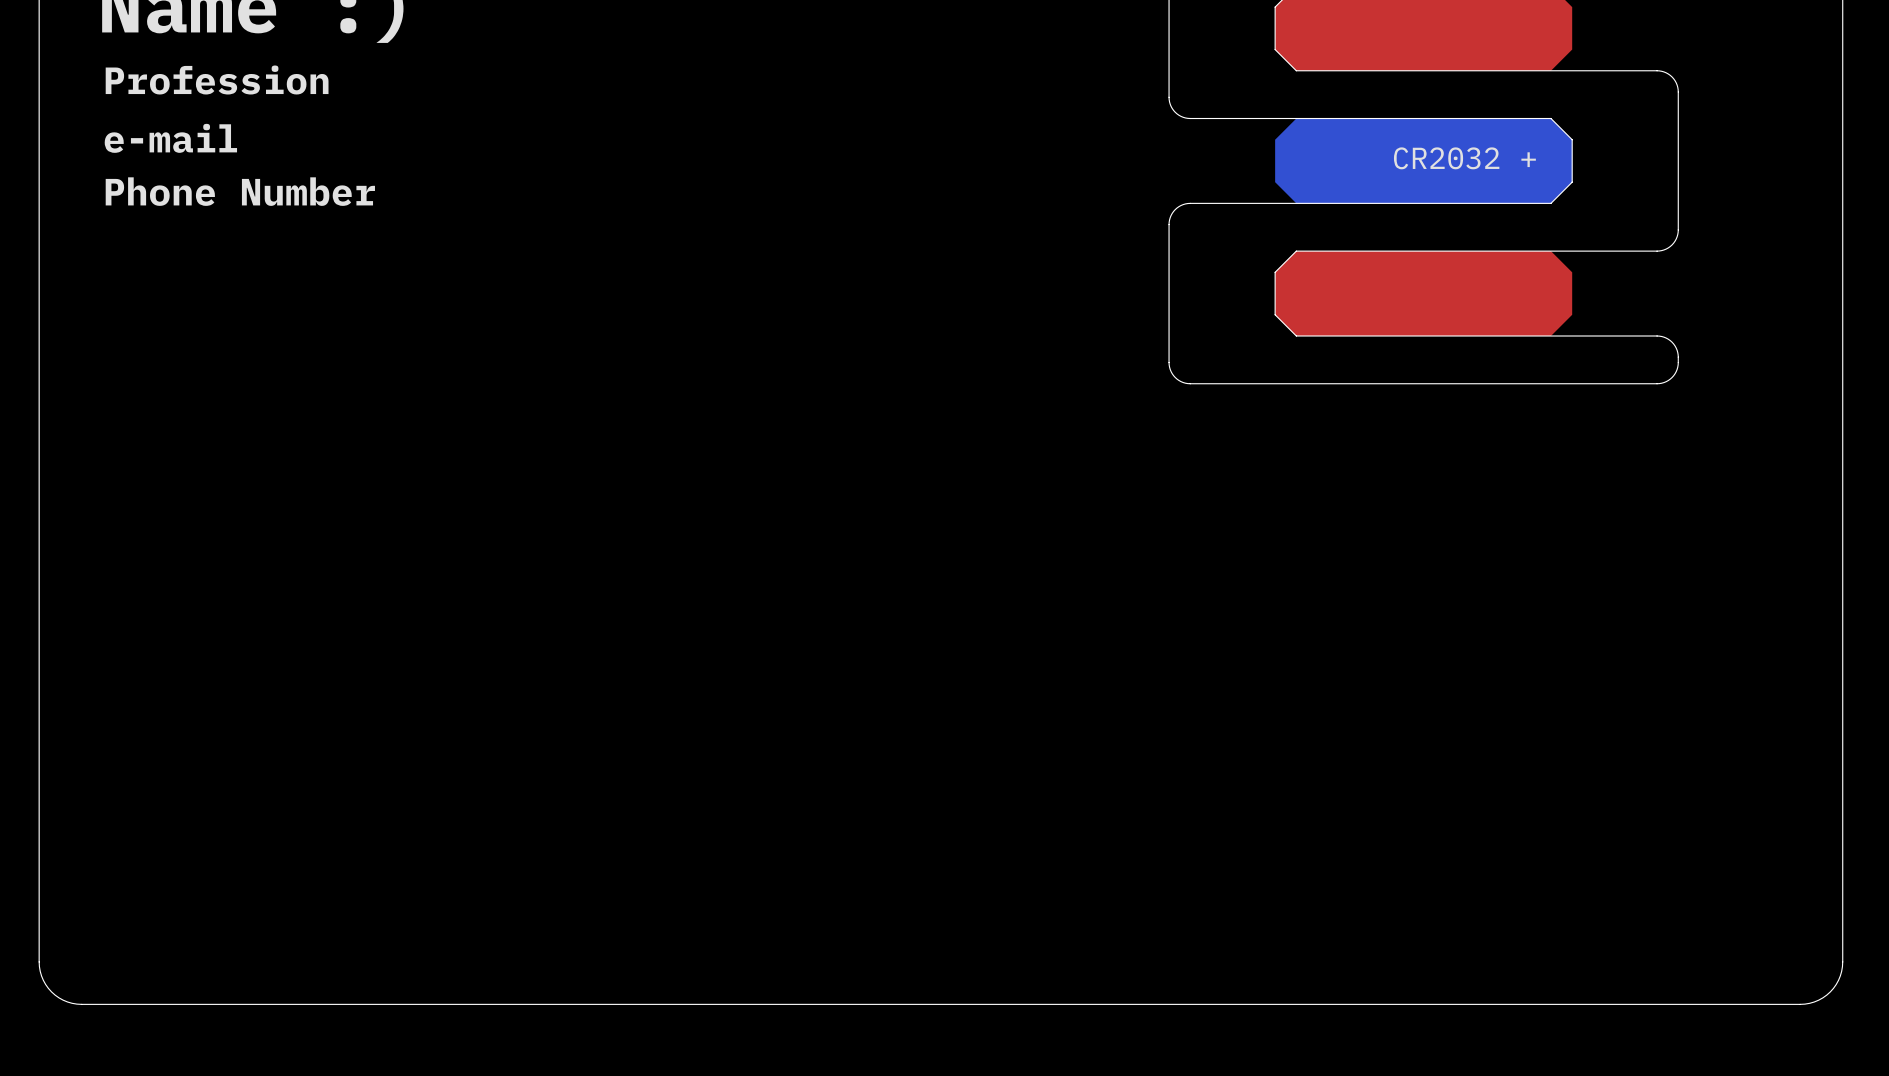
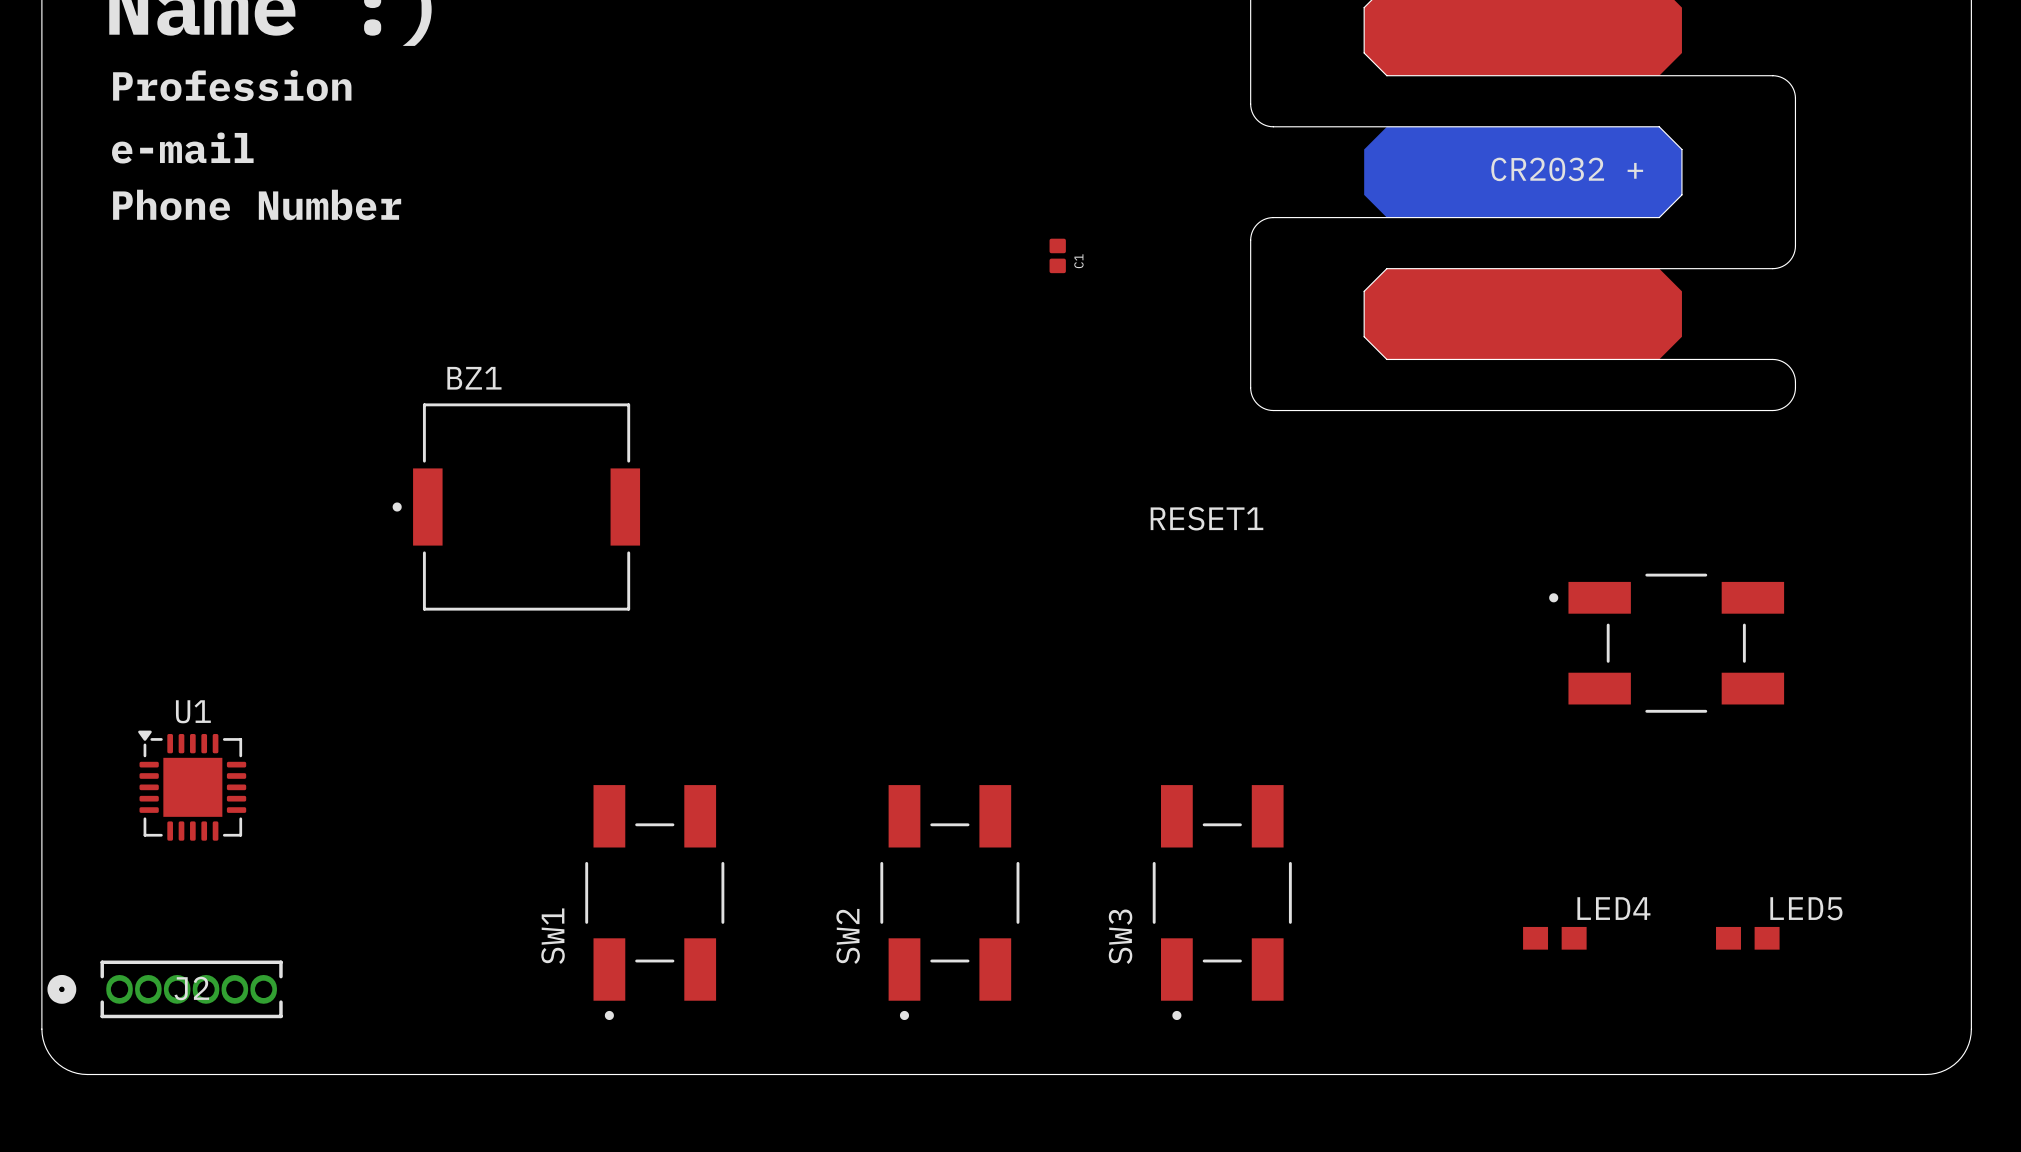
C1: none -> (1057, 255)
BZ1: none -> (516, 507)
RESET1: none -> (1666, 643)
U1: none -> (192, 785)
SW1: none -> (654, 902)
SW2: none -> (949, 902)
SW3: none -> (1222, 902)
LED4: none -> (1554, 938)
LED5: none -> (1747, 938)
J2: none -> (165, 989)

